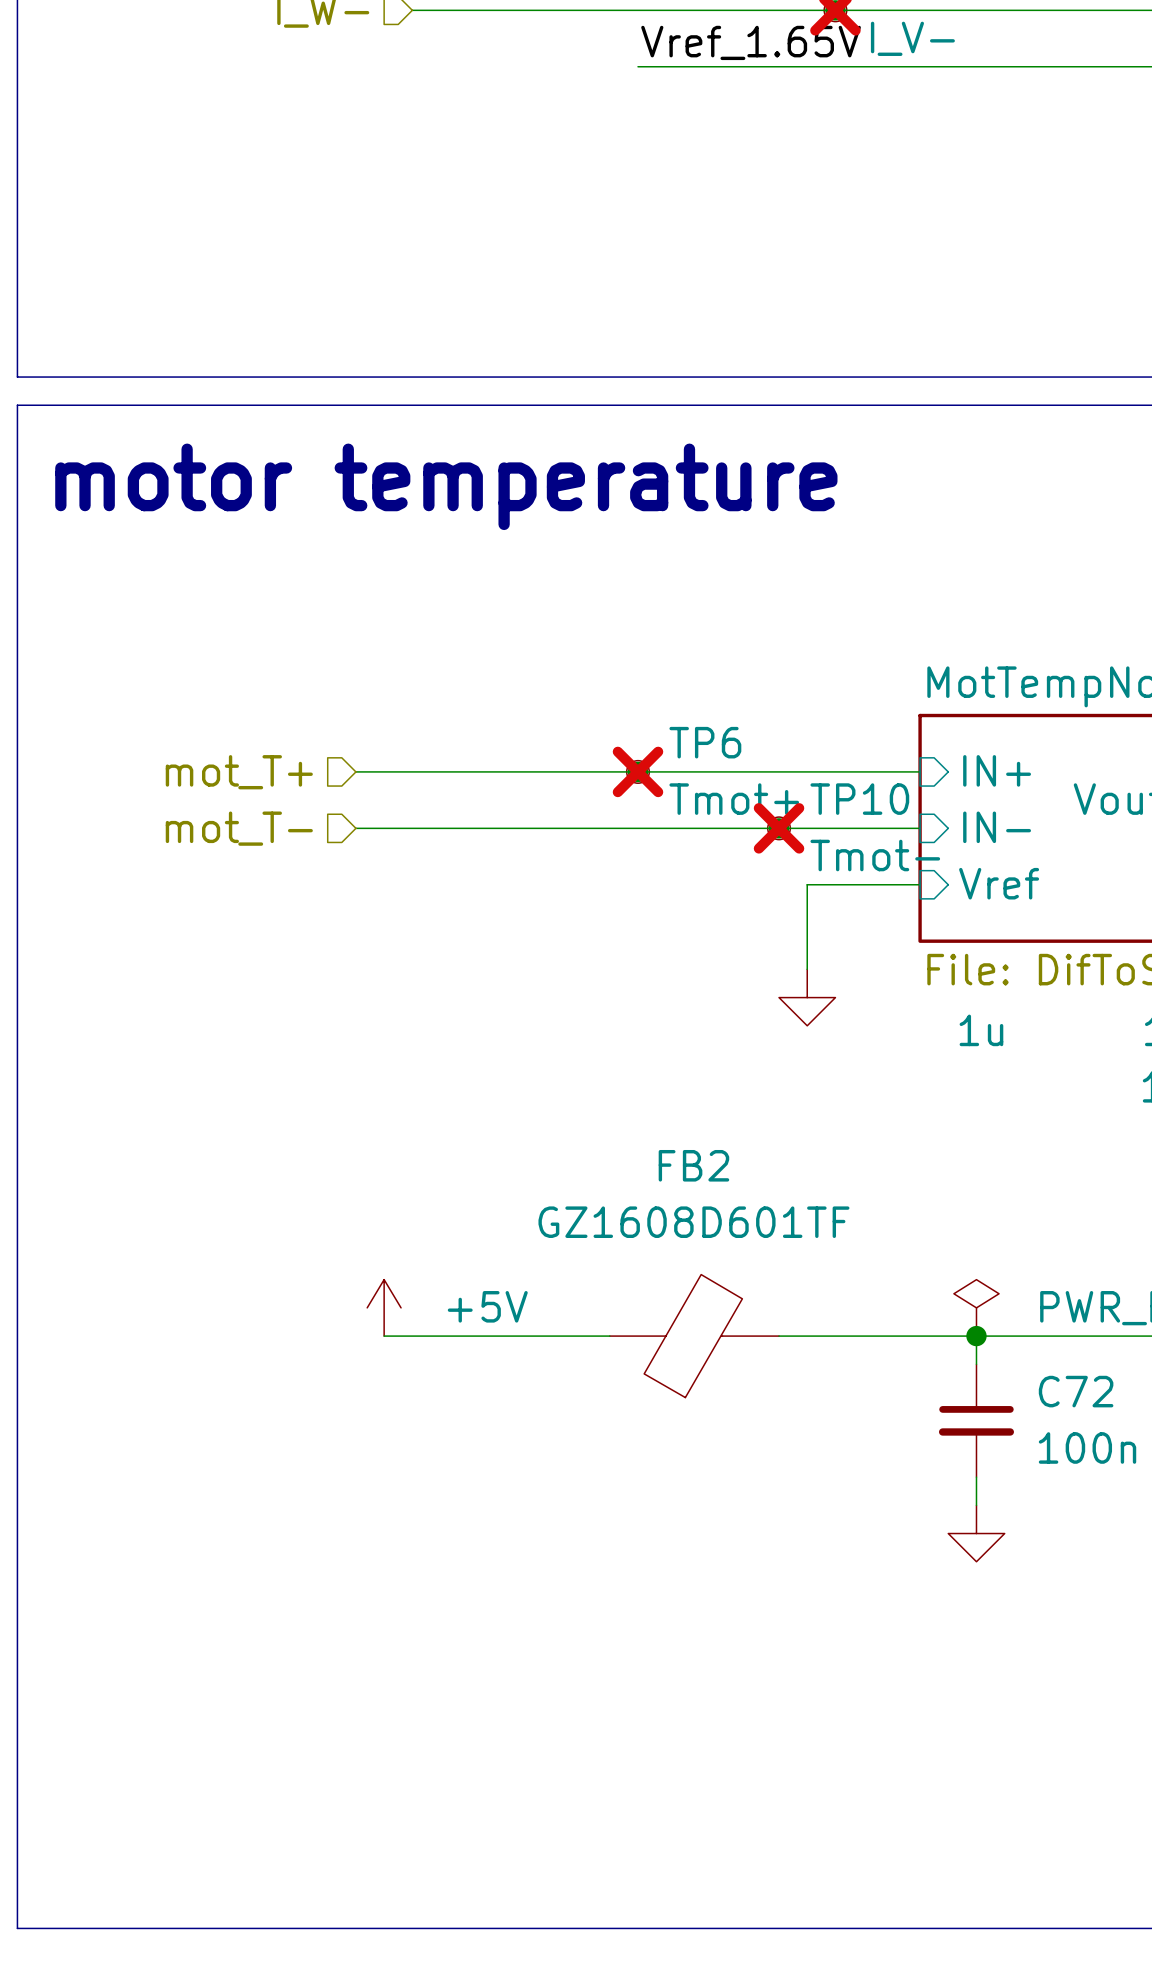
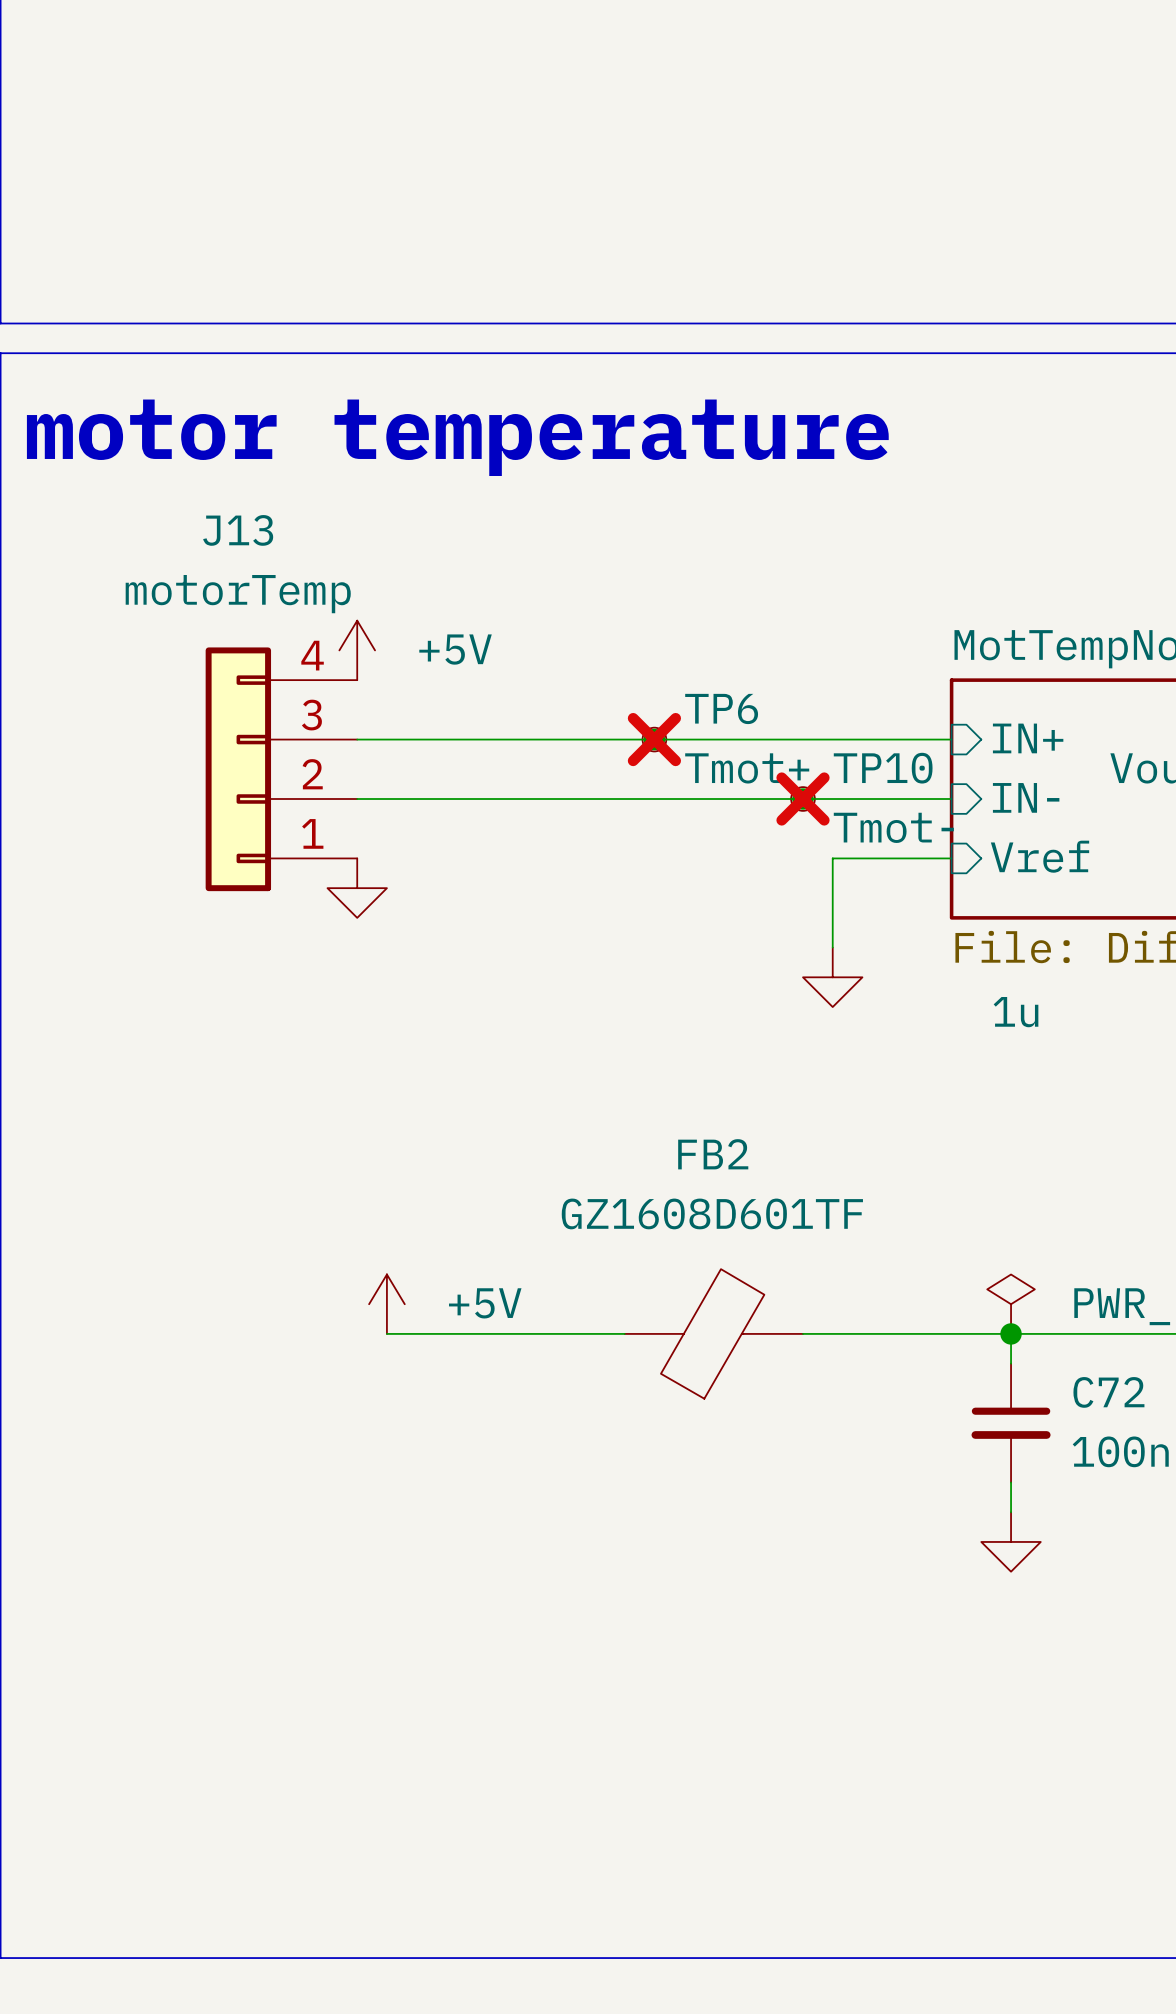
power symbol: none -> +5V (357, 650)
hierarchical label: mot_T+ (239, 772) -> none
J13: none -> motorTemp (281, 769)
hierarchical label: mot_T- (239, 828) -> none
power symbol: none -> (357, 888)

